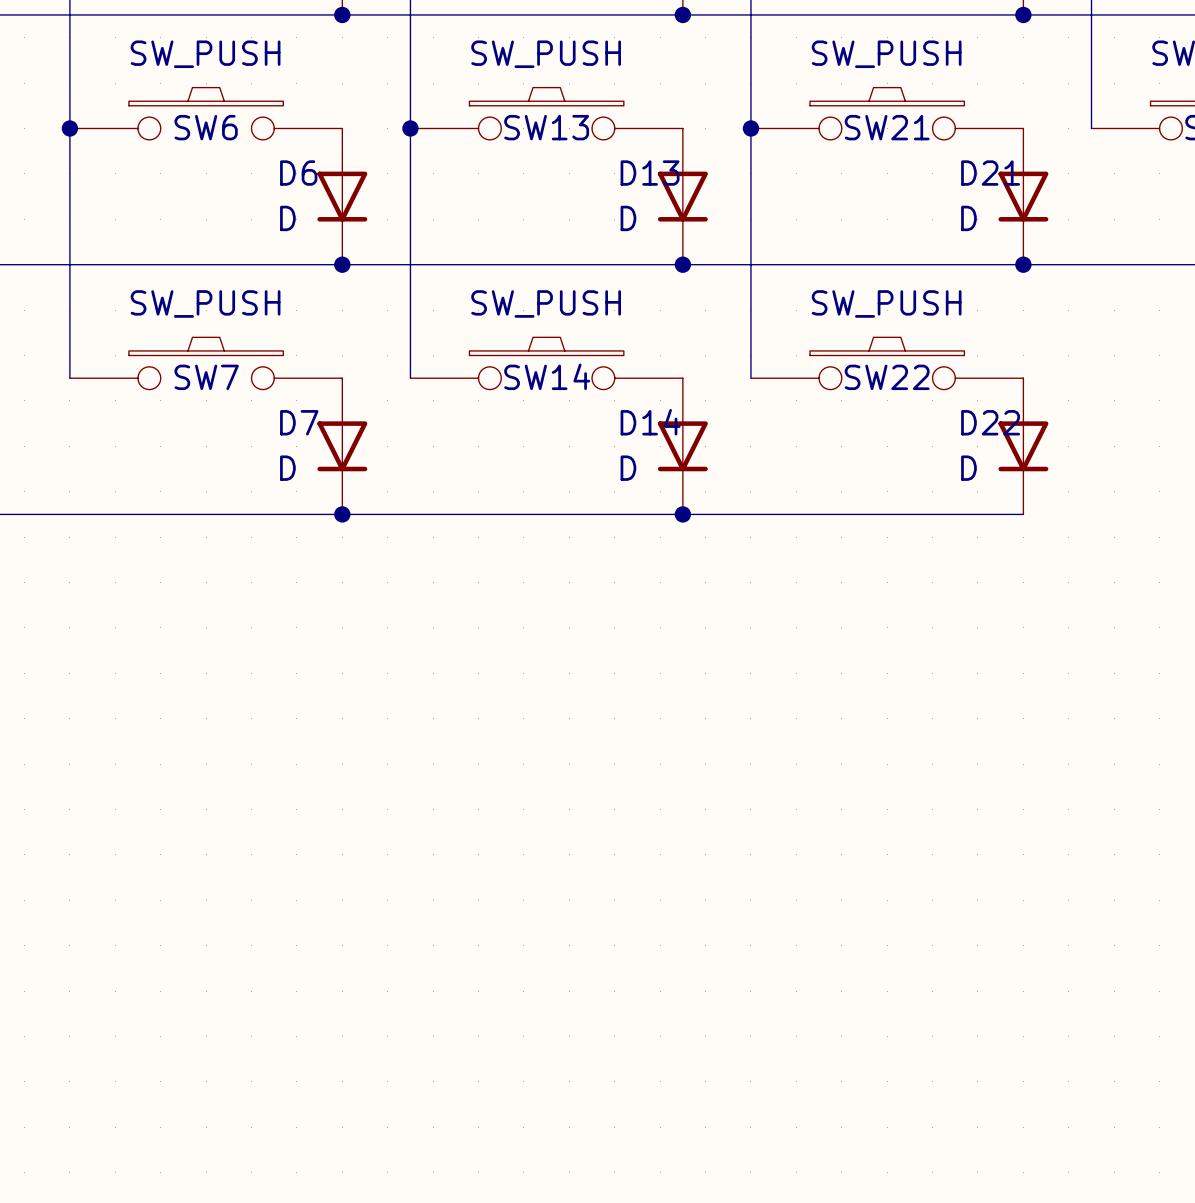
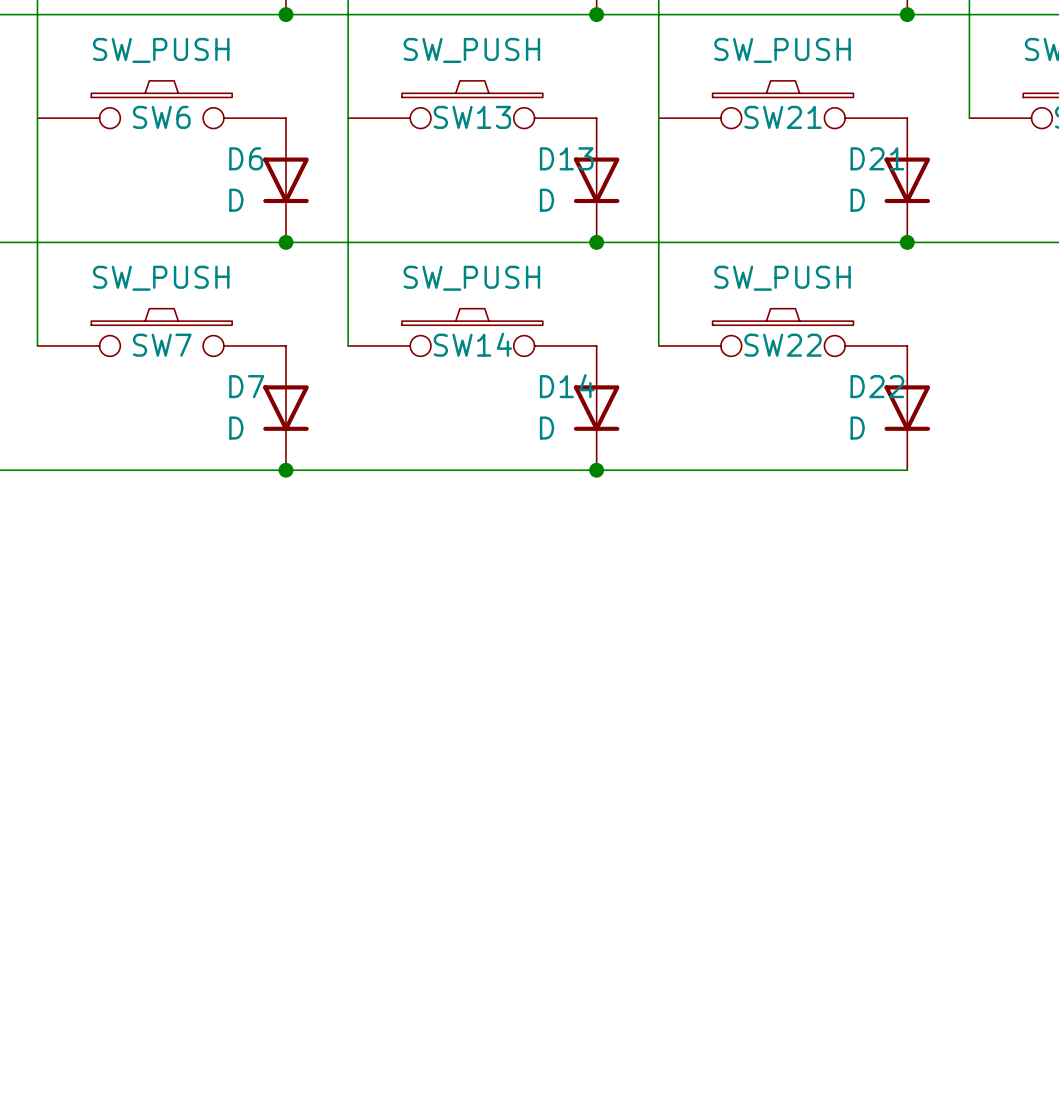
junction: (69, 128) -> none
junction: (410, 128) -> none
junction: (750, 128) -> none

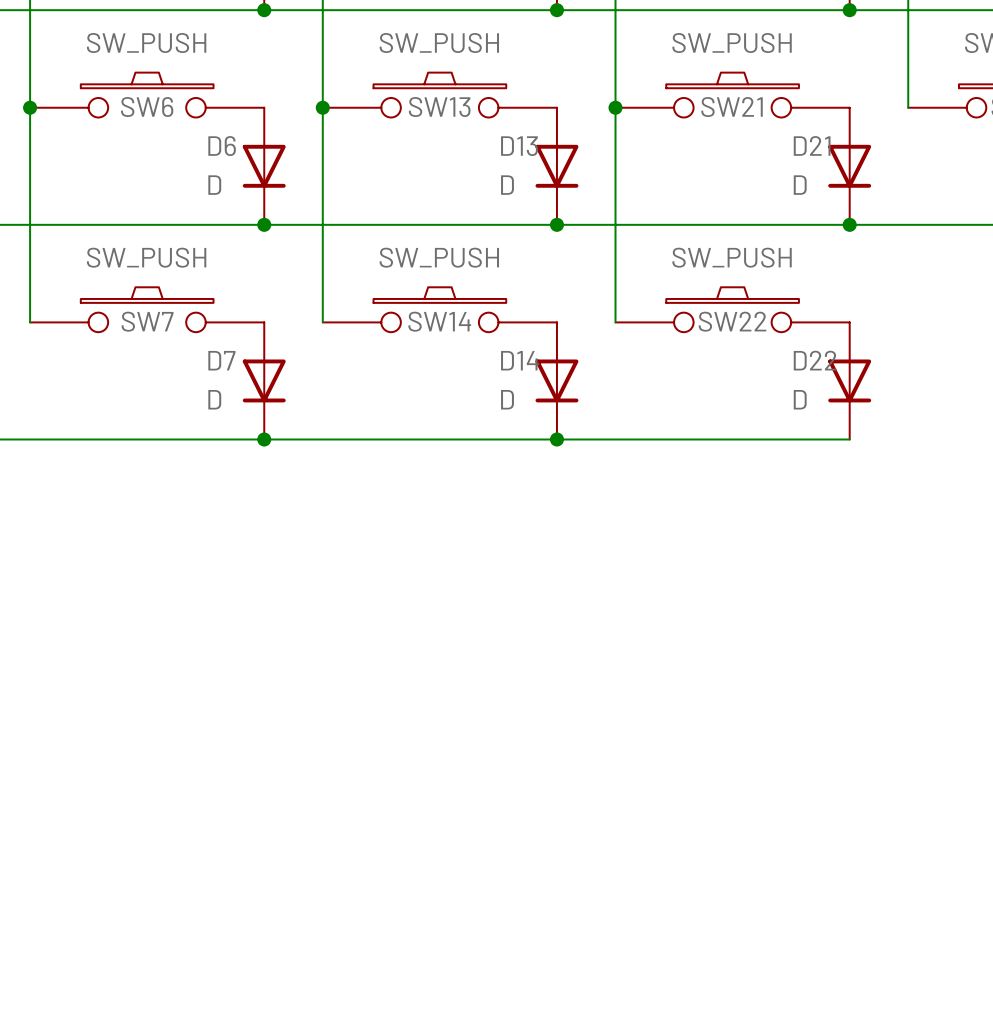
junction: none -> (30, 107)
junction: none -> (322, 107)
junction: none -> (615, 107)

